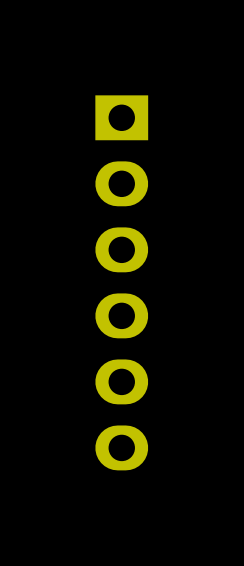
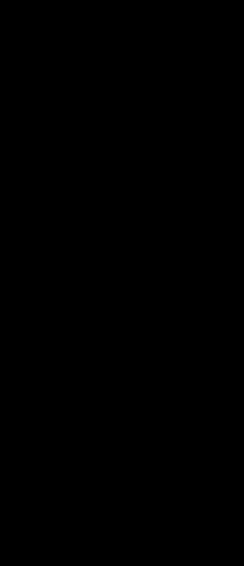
part: (121, 282) -> none

